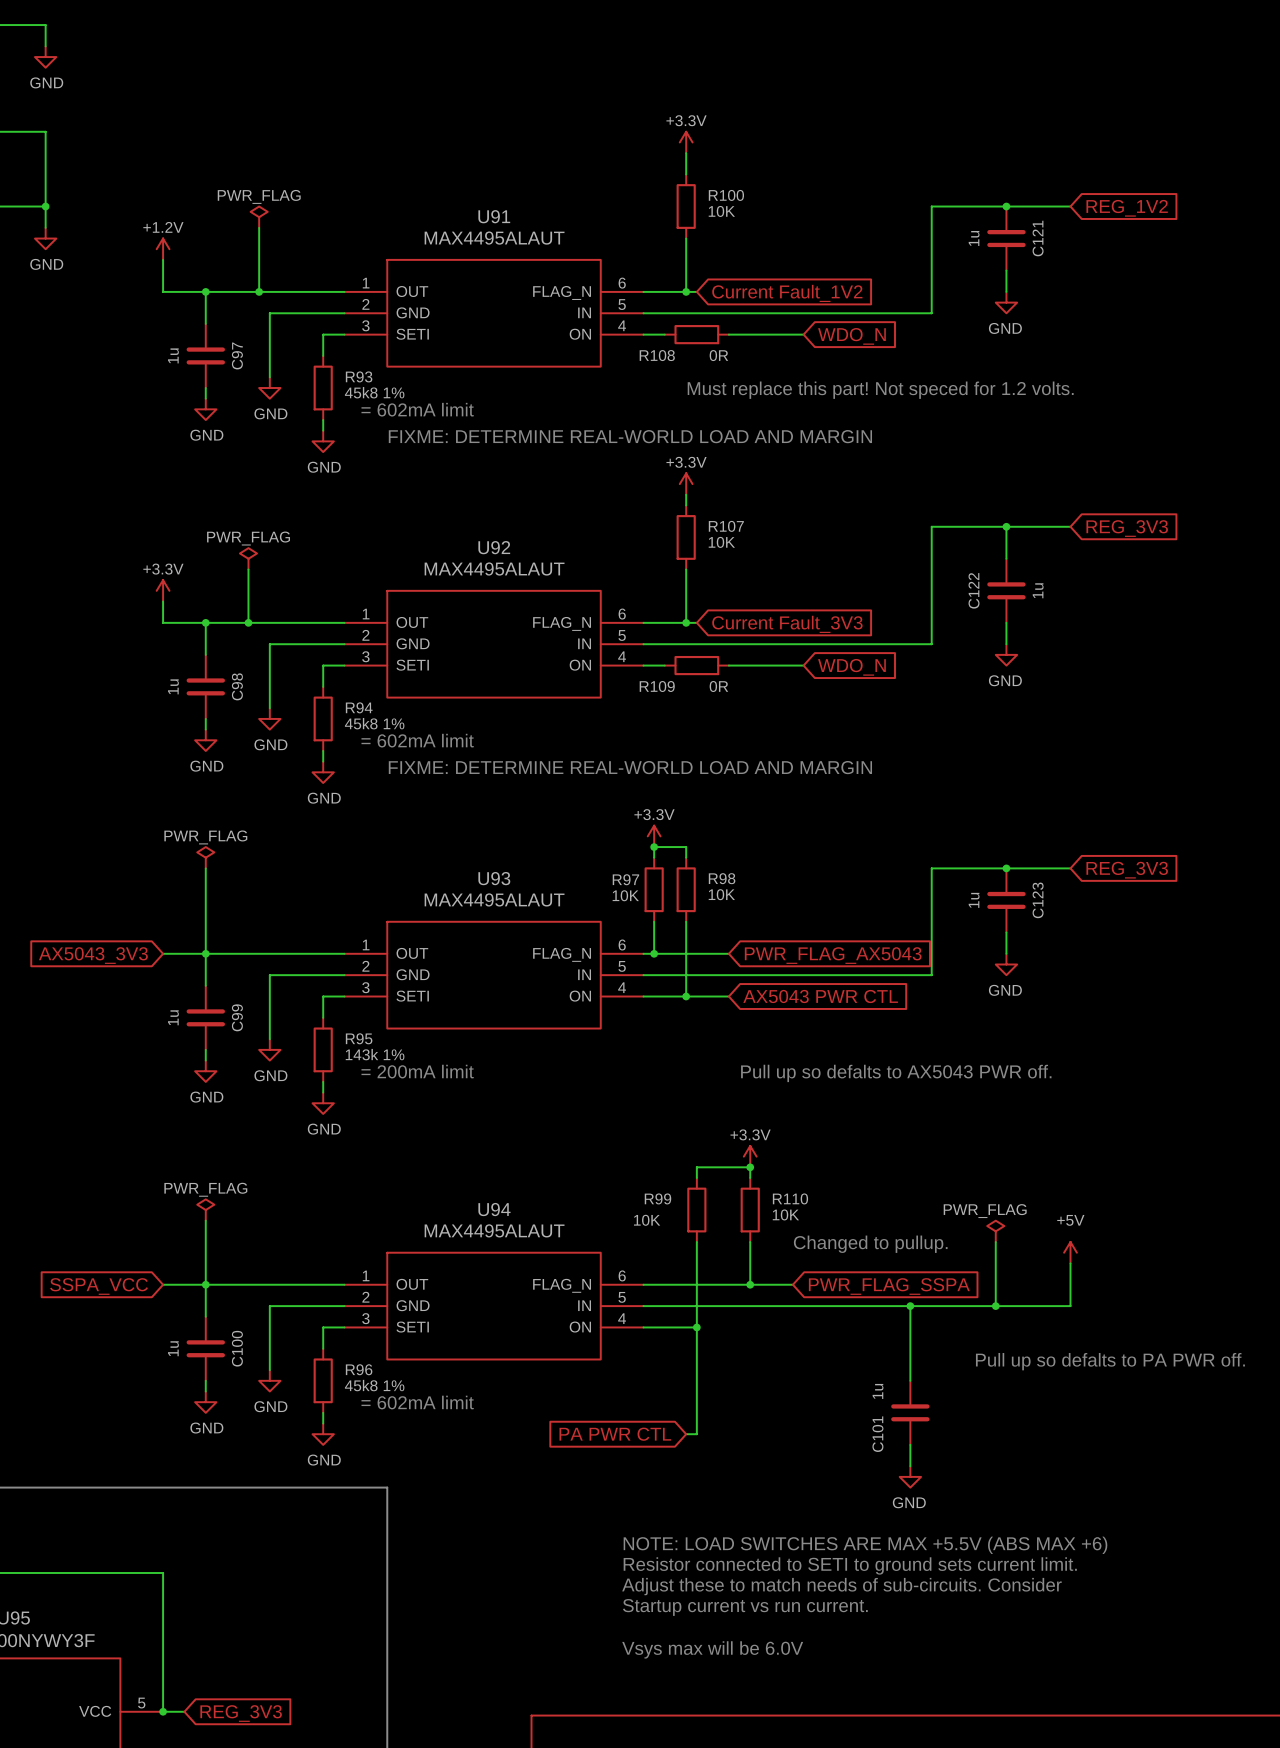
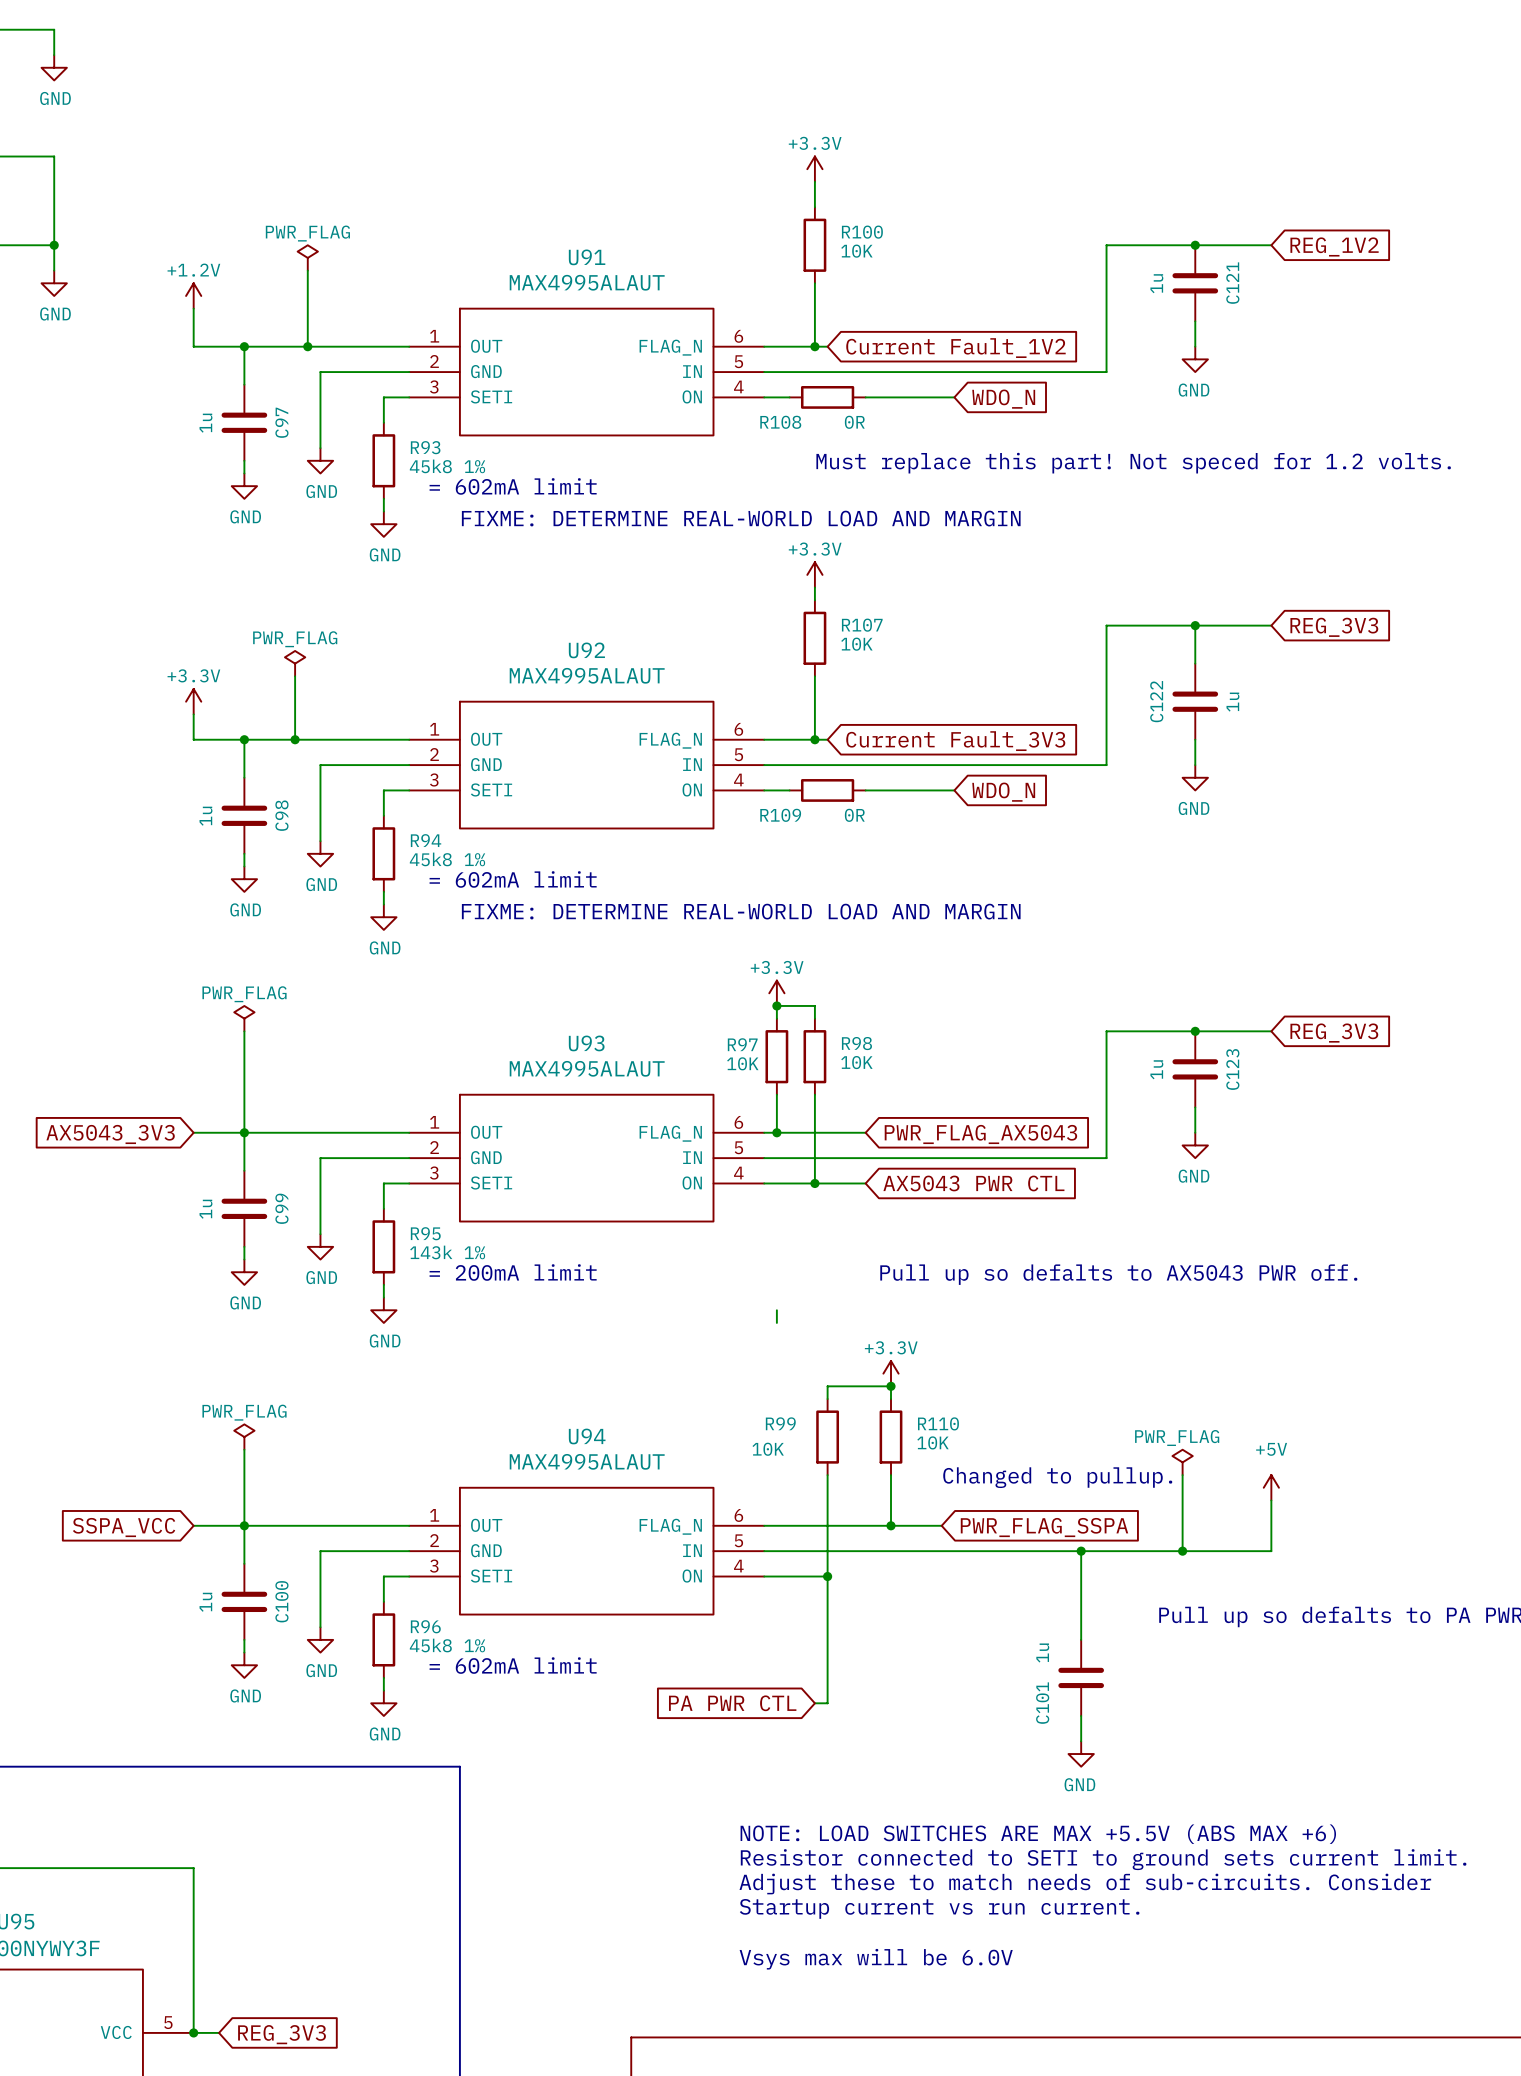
U91 value: MAX4495ALAUT (494, 238) -> MAX4995ALAUT (587, 282)
U92 value: MAX4495ALAUT (494, 569) -> MAX4995ALAUT (587, 675)
U93 value: MAX4495ALAUT (494, 899) -> MAX4995ALAUT (587, 1068)
wire: none -> (776, 1310) (776, 1322)
U94 value: MAX4495ALAUT (494, 1230) -> MAX4995ALAUT (587, 1461)

